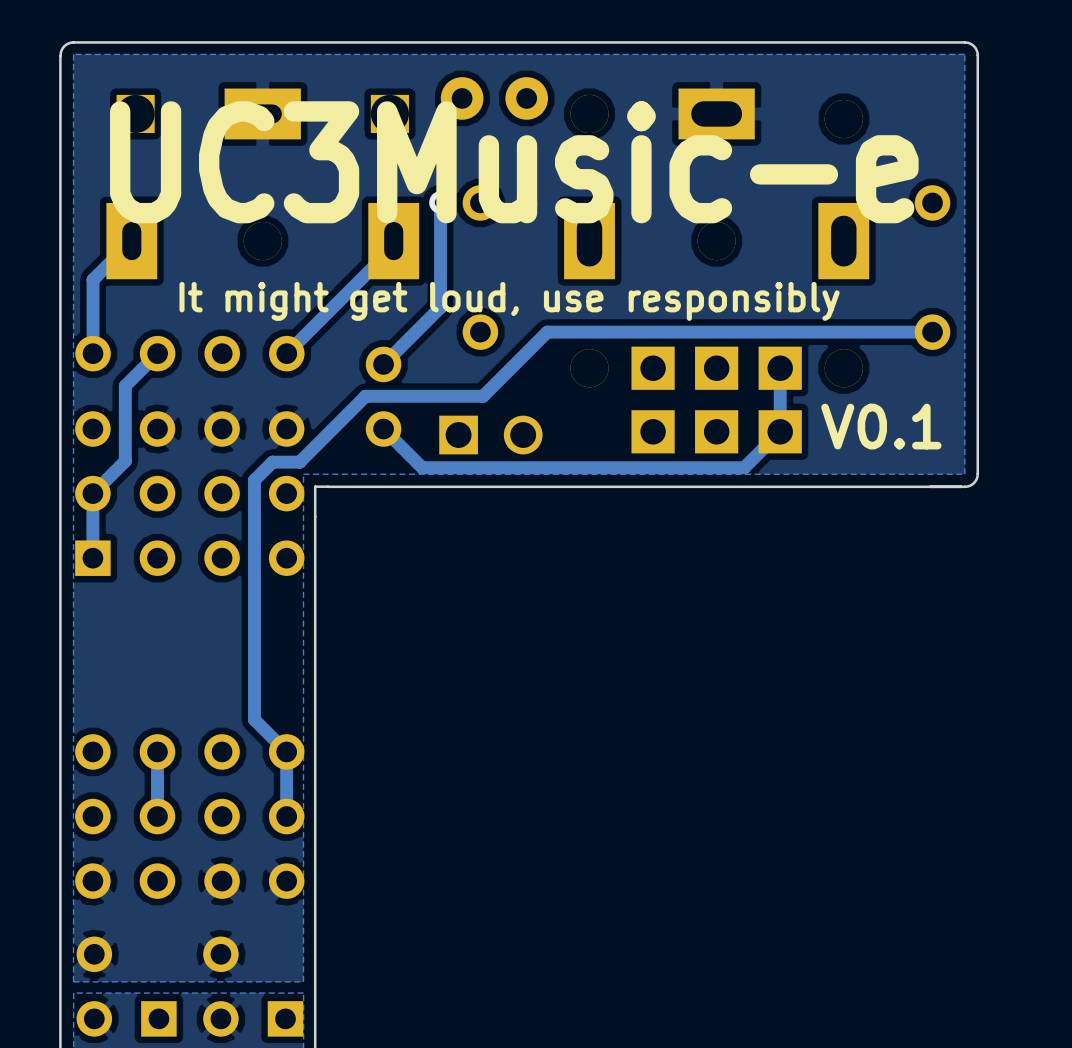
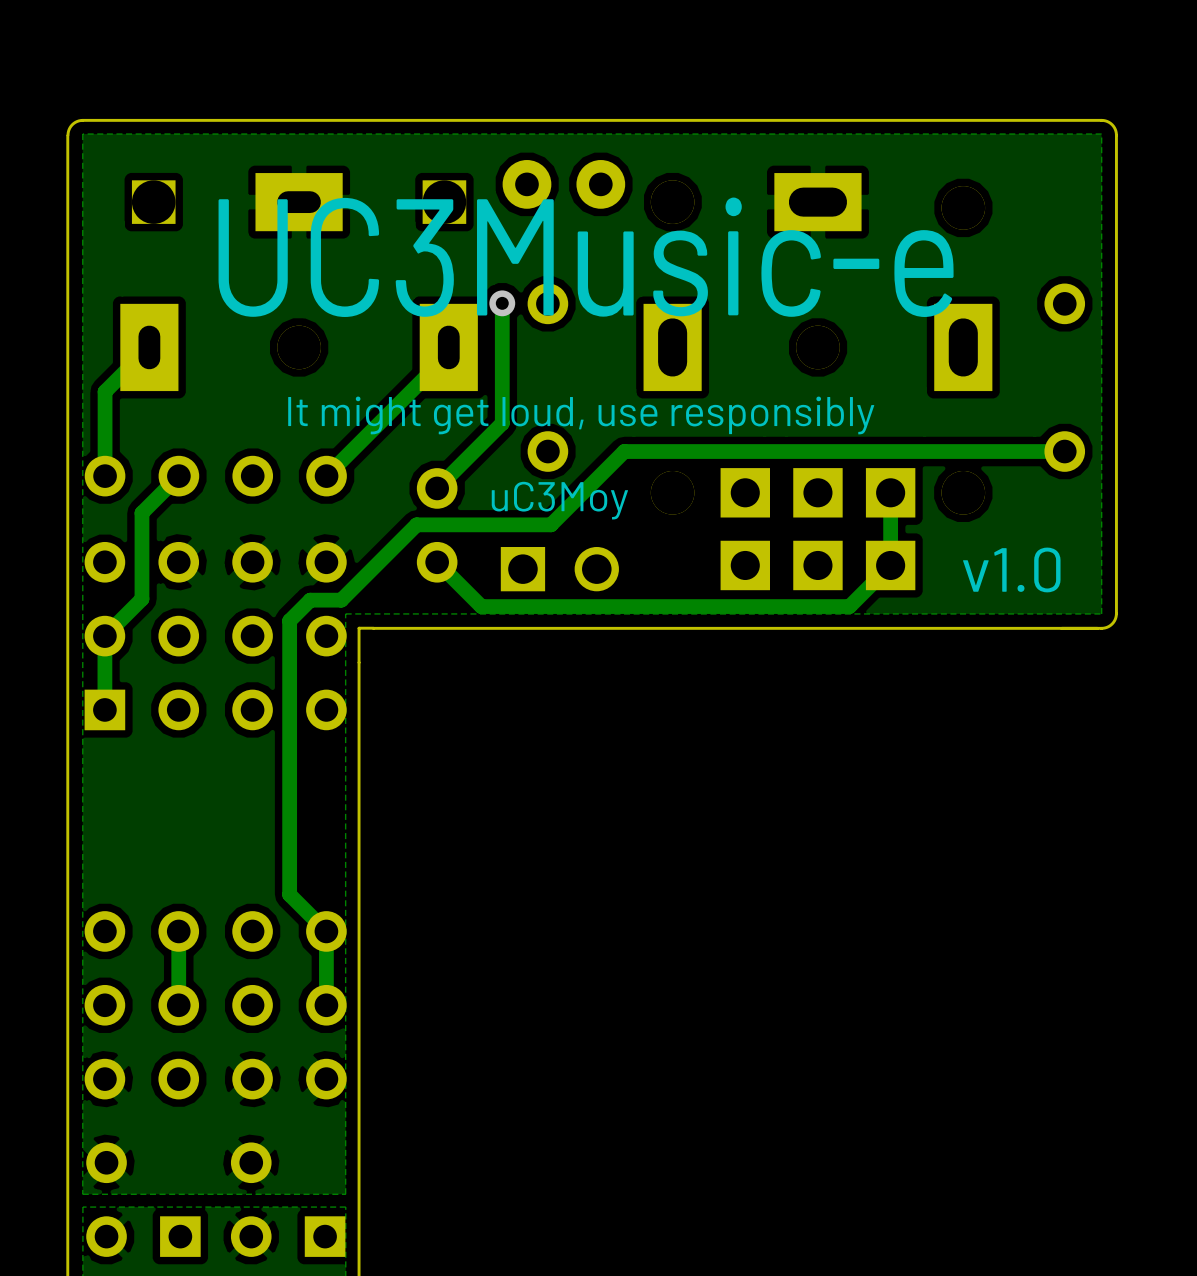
text: none -> uC3Moy (559, 500)
text: V0.1 (881, 426) -> v1.0 (1011, 569)

